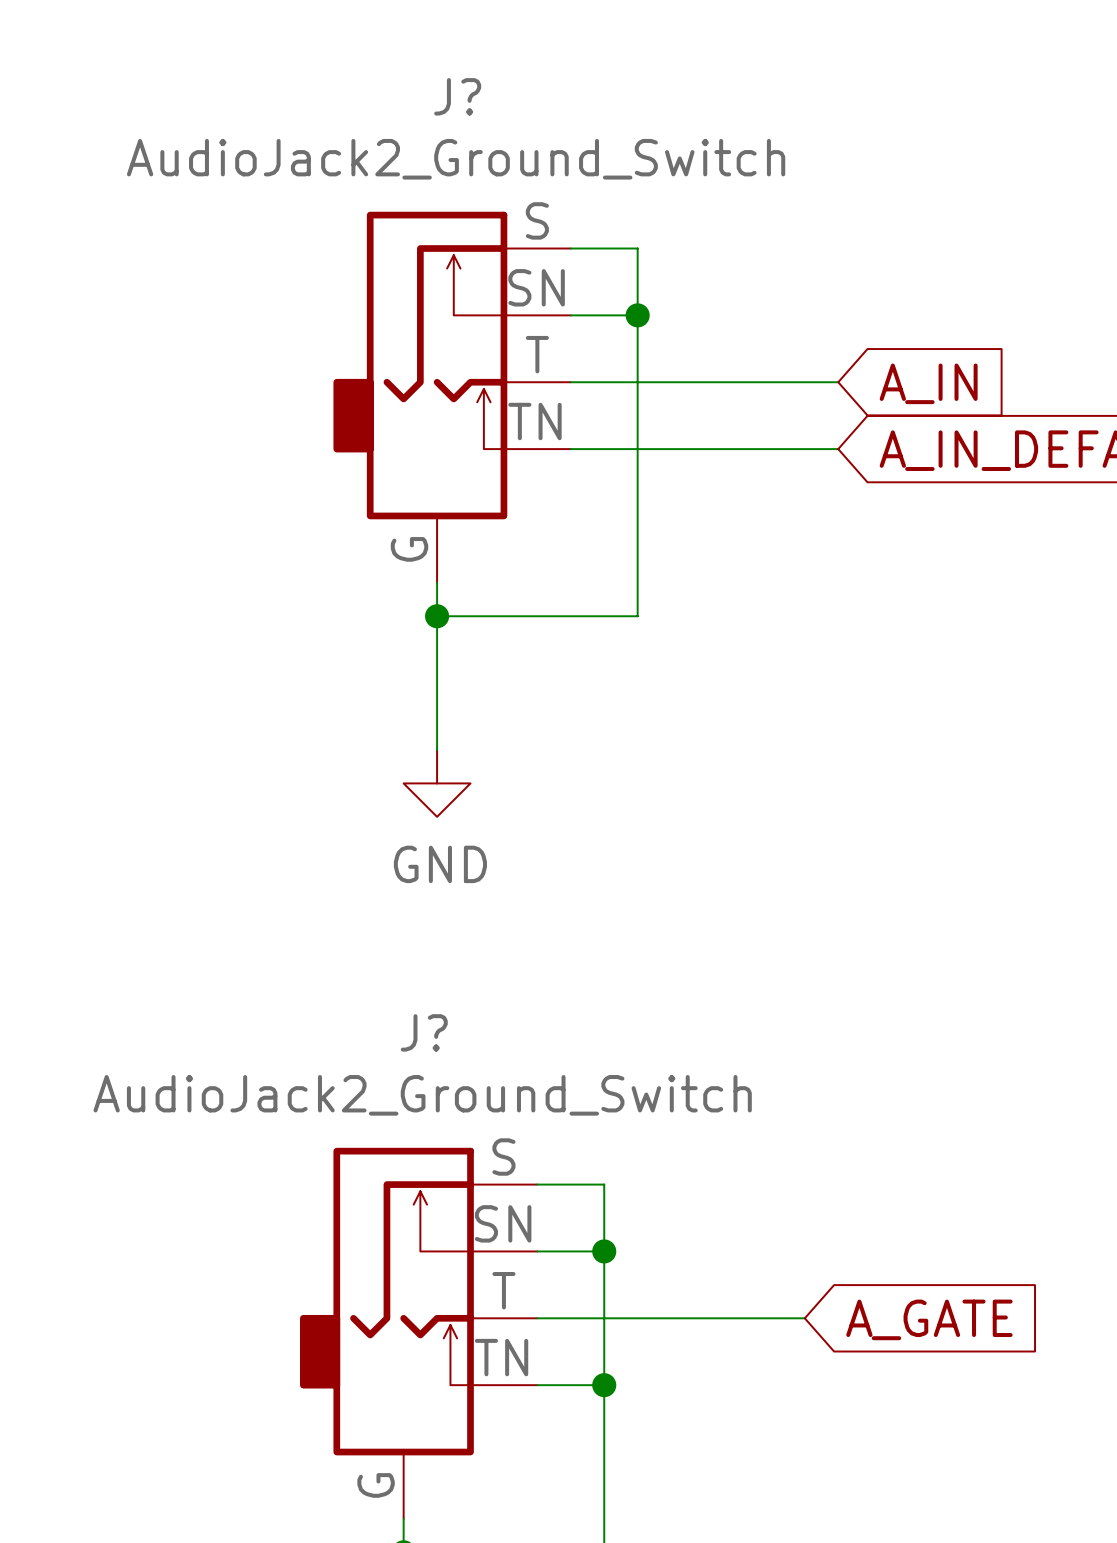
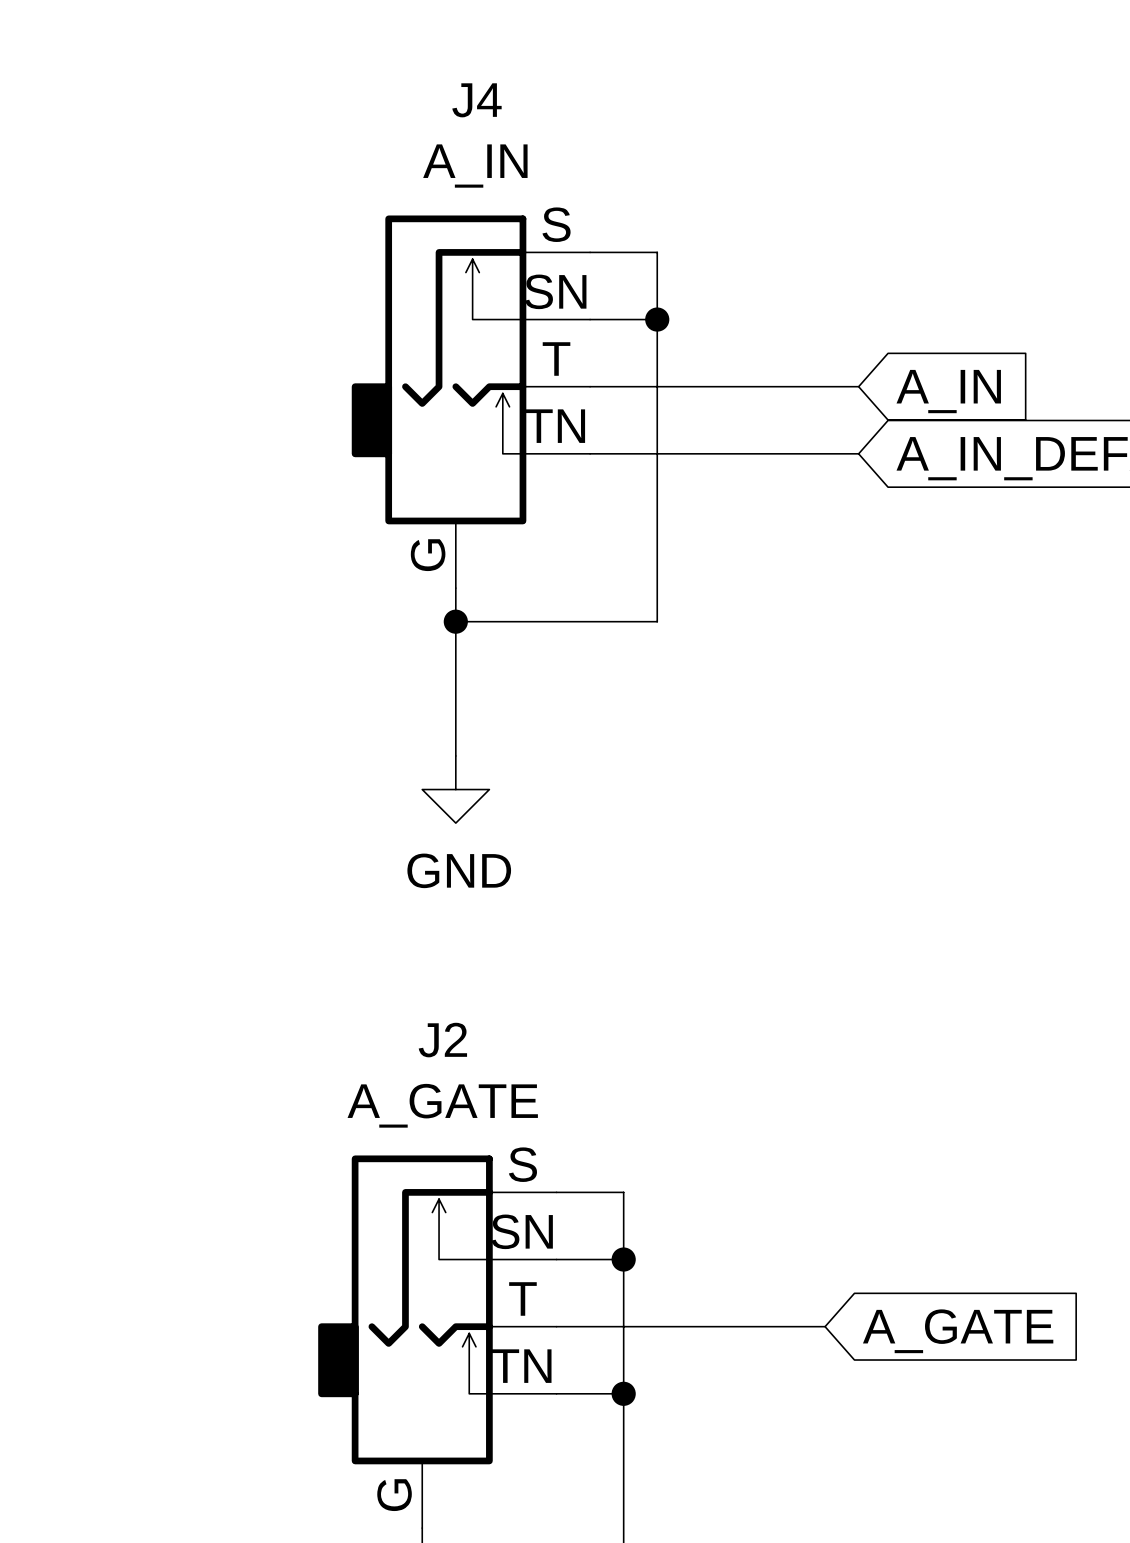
J? name: J? (457, 96) -> J4 (476, 100)
J? value: AudioJack2_Ground_Switch (456, 159) -> A_IN (475, 166)
J? name: J? (424, 1032) -> J2 (442, 1040)
J? value: AudioJack2_Ground_Switch (422, 1095) -> A_GATE (442, 1105)

